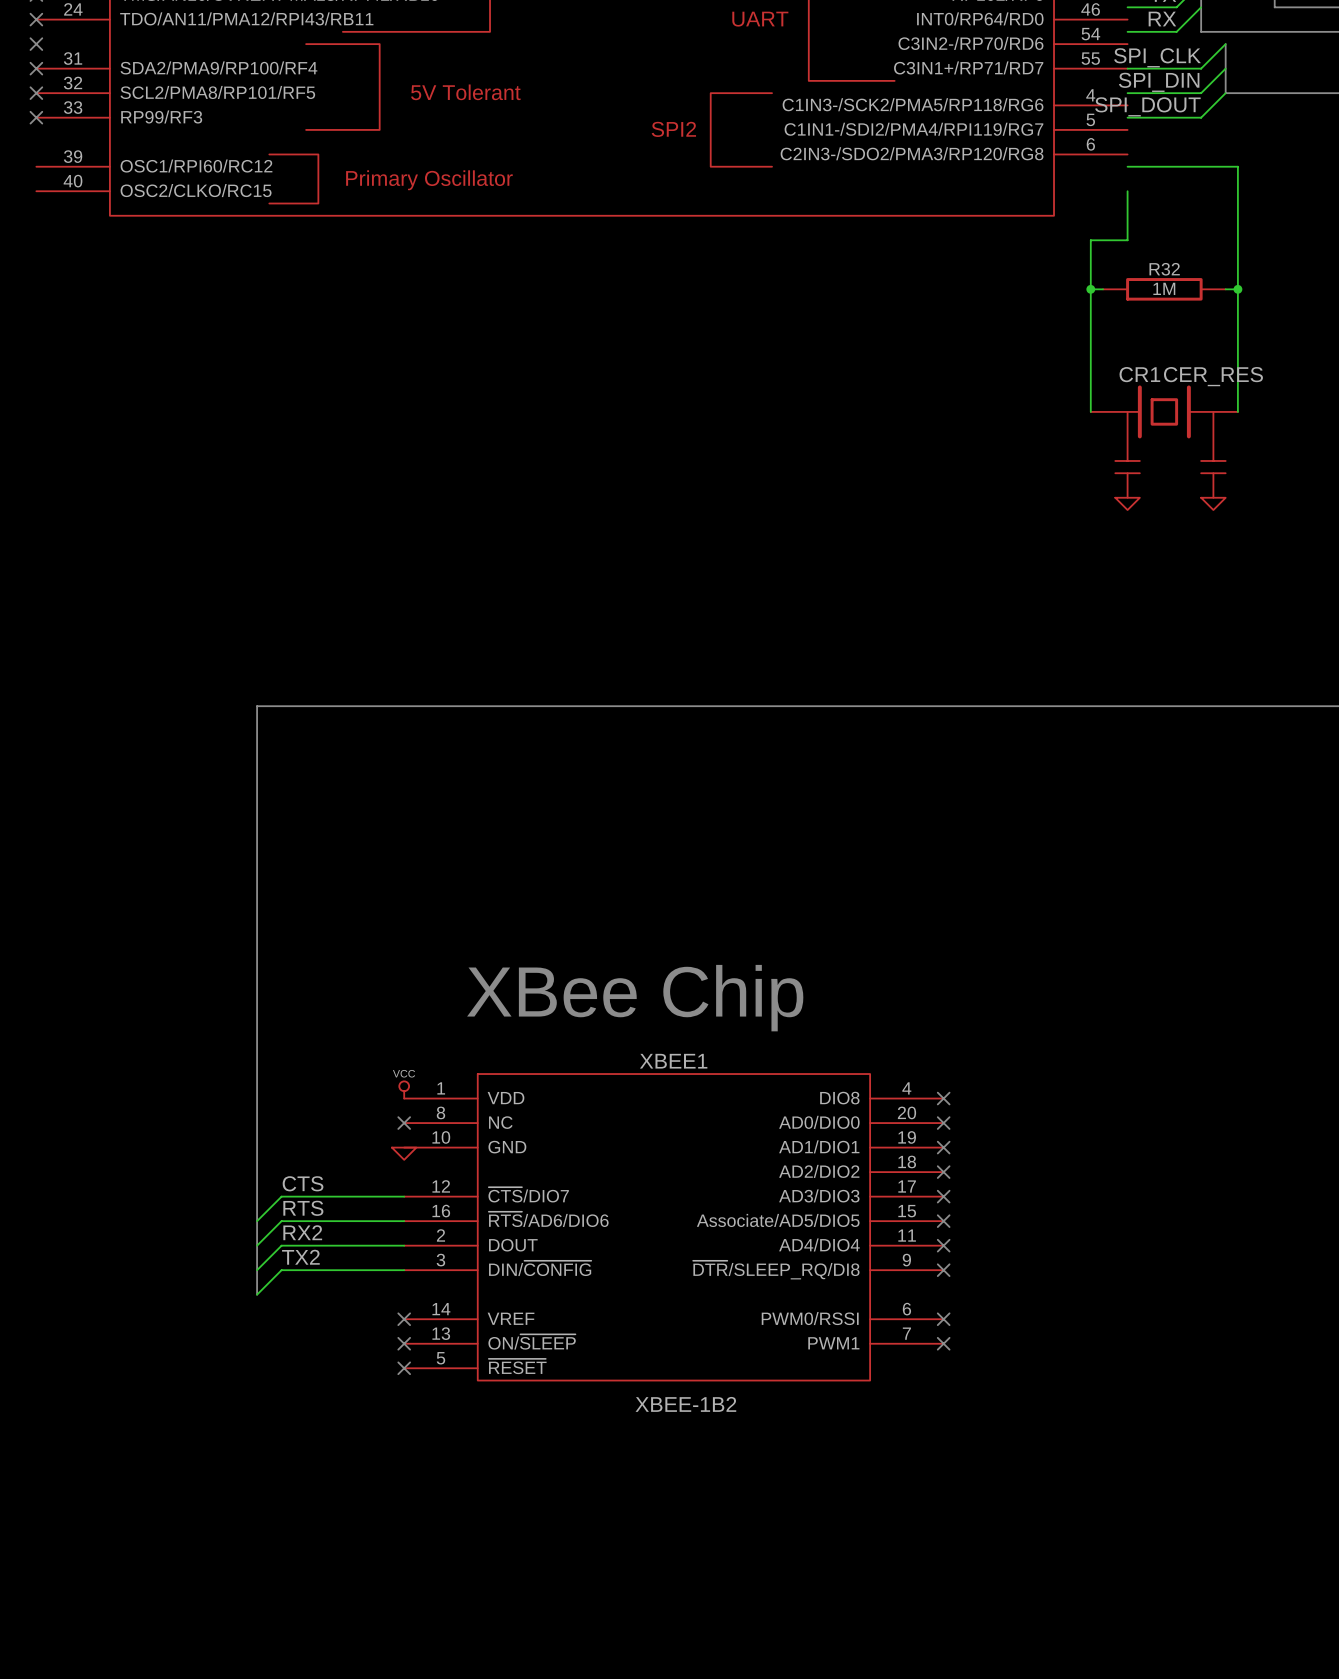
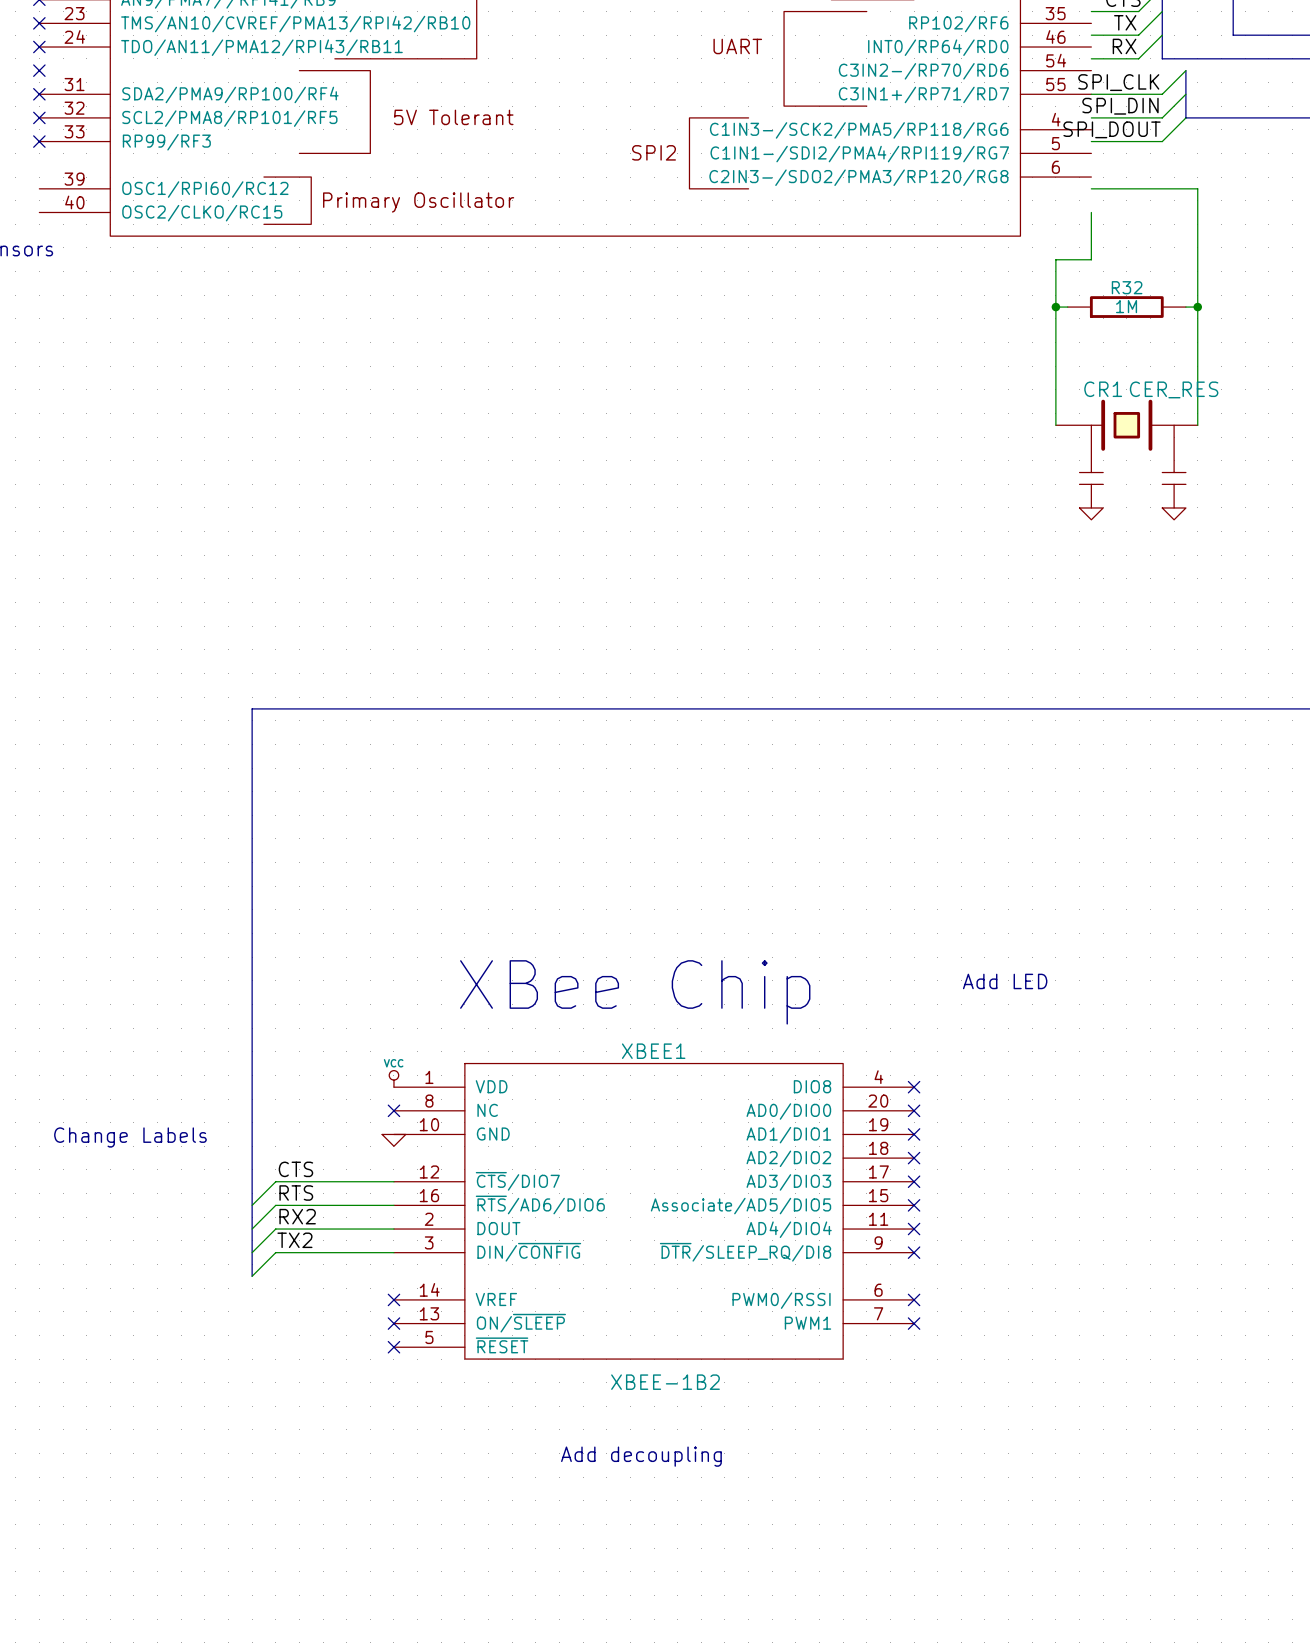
text: none -> Add LED (1005, 981)
text: none -> Change Labels (130, 1137)
text: none -> Add decoupling (641, 1456)

